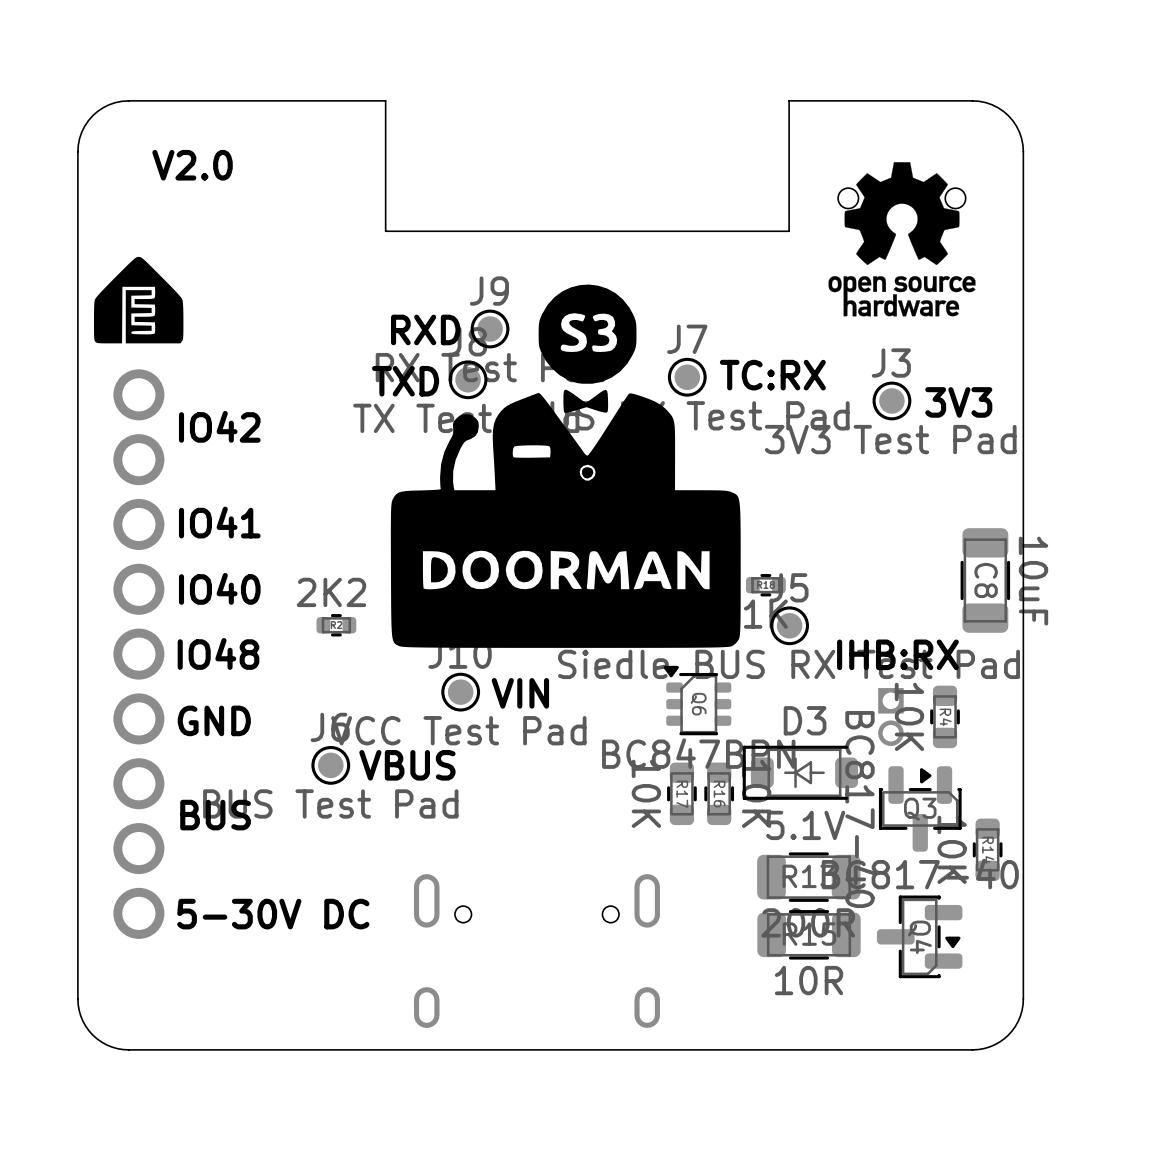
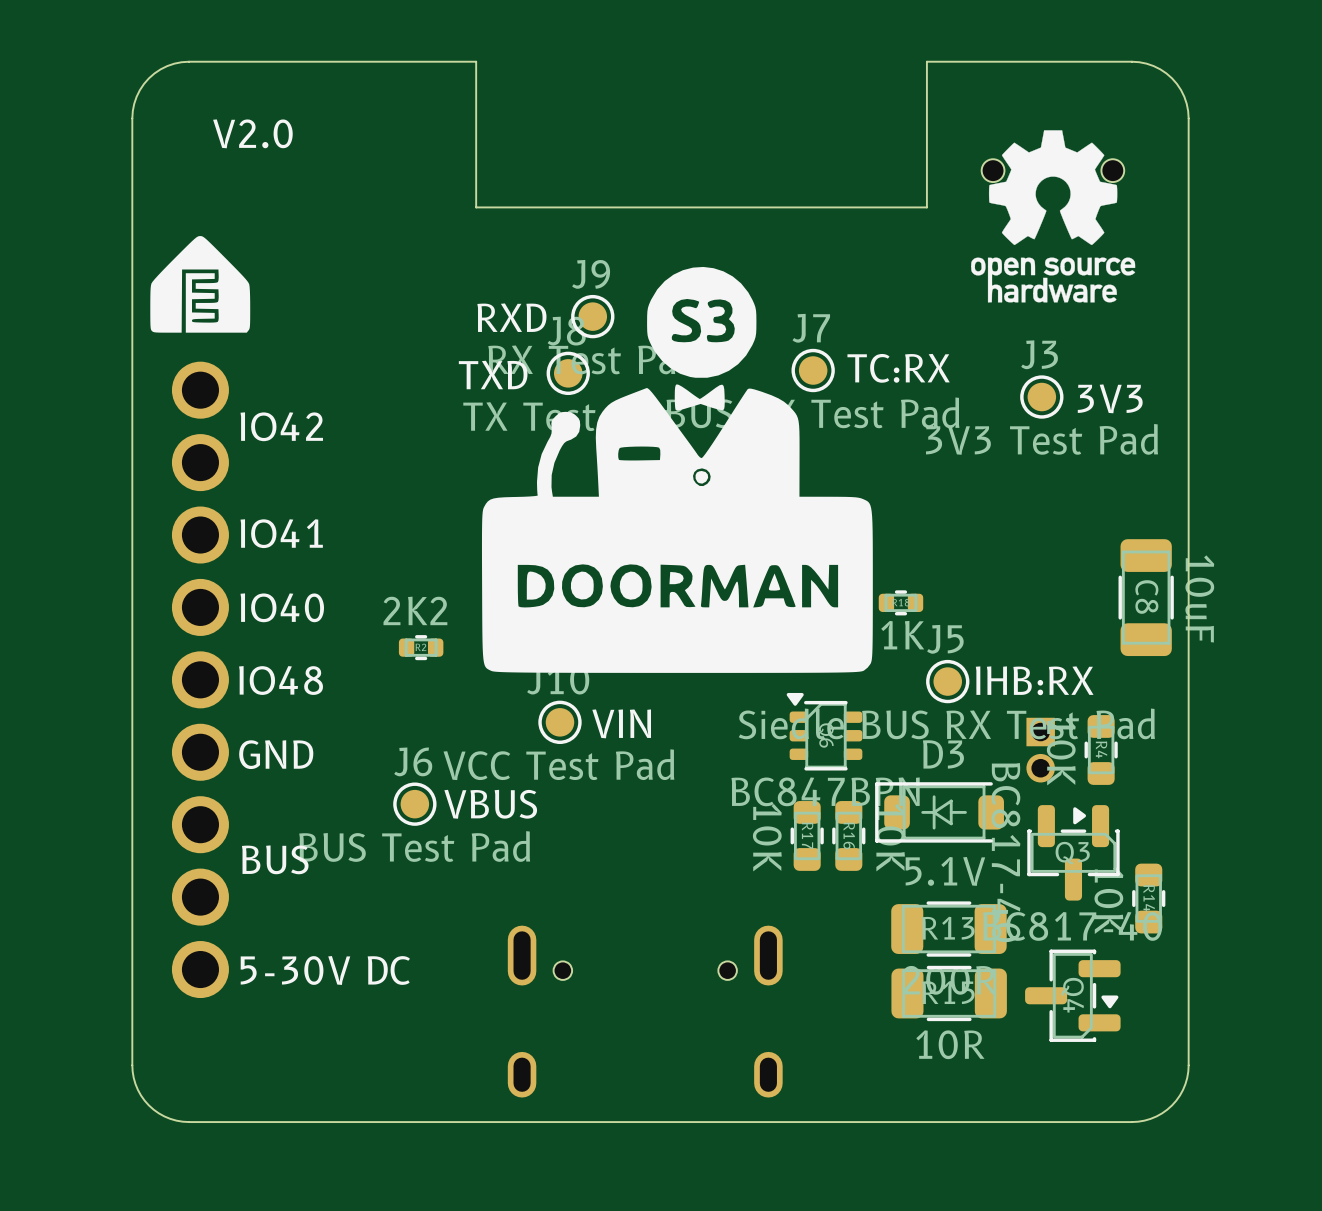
J5 position: (789, 625) -> (947, 681)

